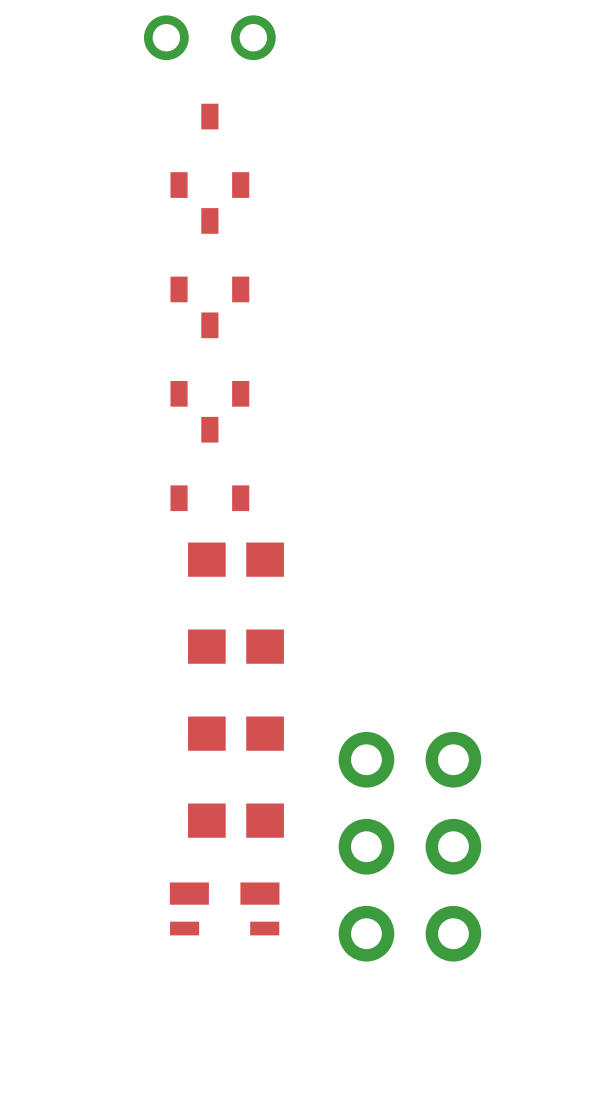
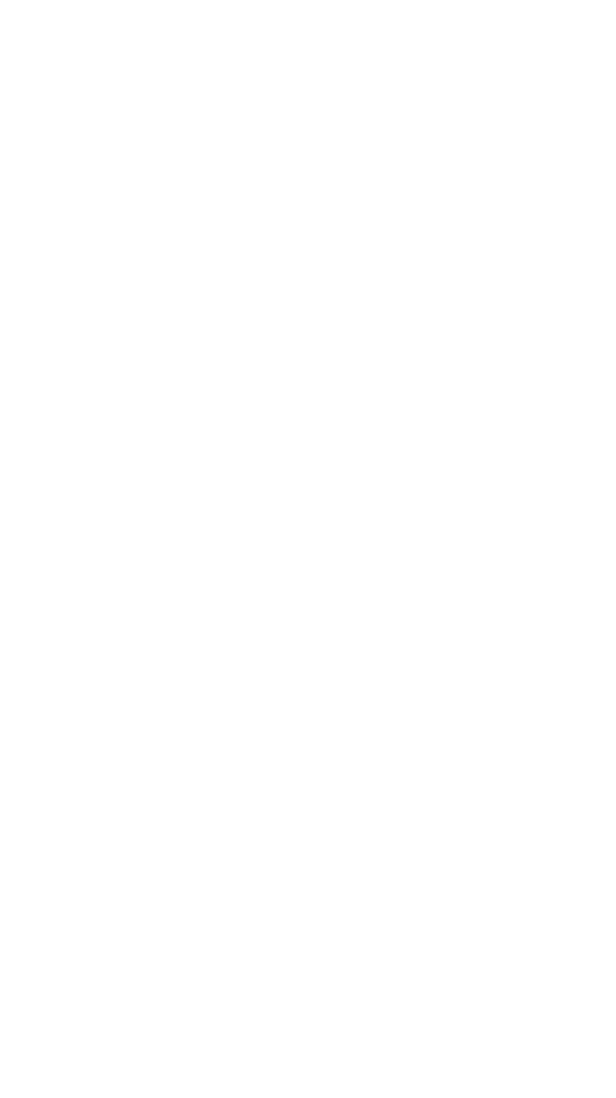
part: (209, 37) -> none
part: (209, 150) -> none
part: (209, 255) -> none
part: (209, 359) -> none
part: (209, 463) -> none
part: (235, 559) -> none
part: (235, 646) -> none
part: (235, 733) -> none
part: (235, 820) -> none
part: (409, 846) -> none
part: (224, 908) -> none

